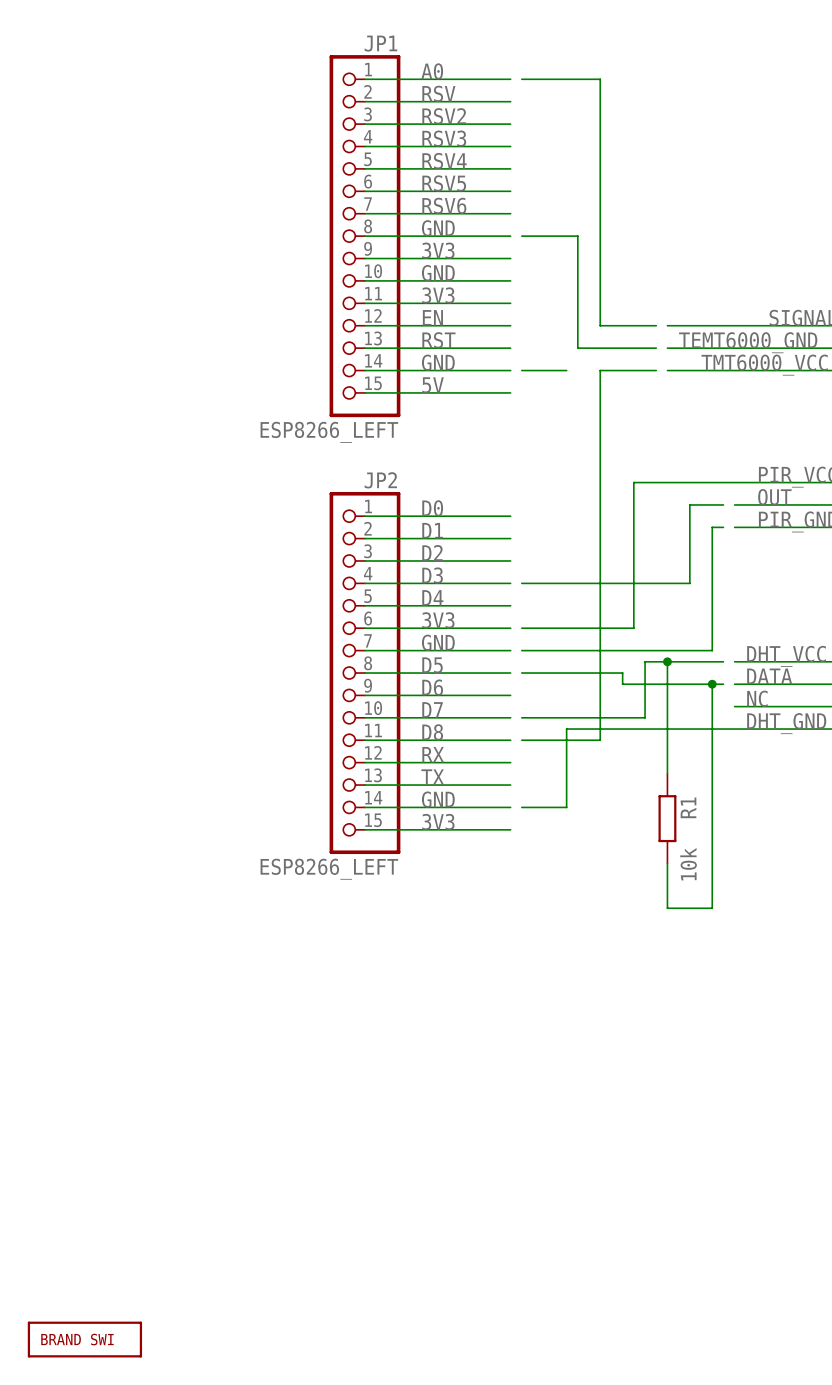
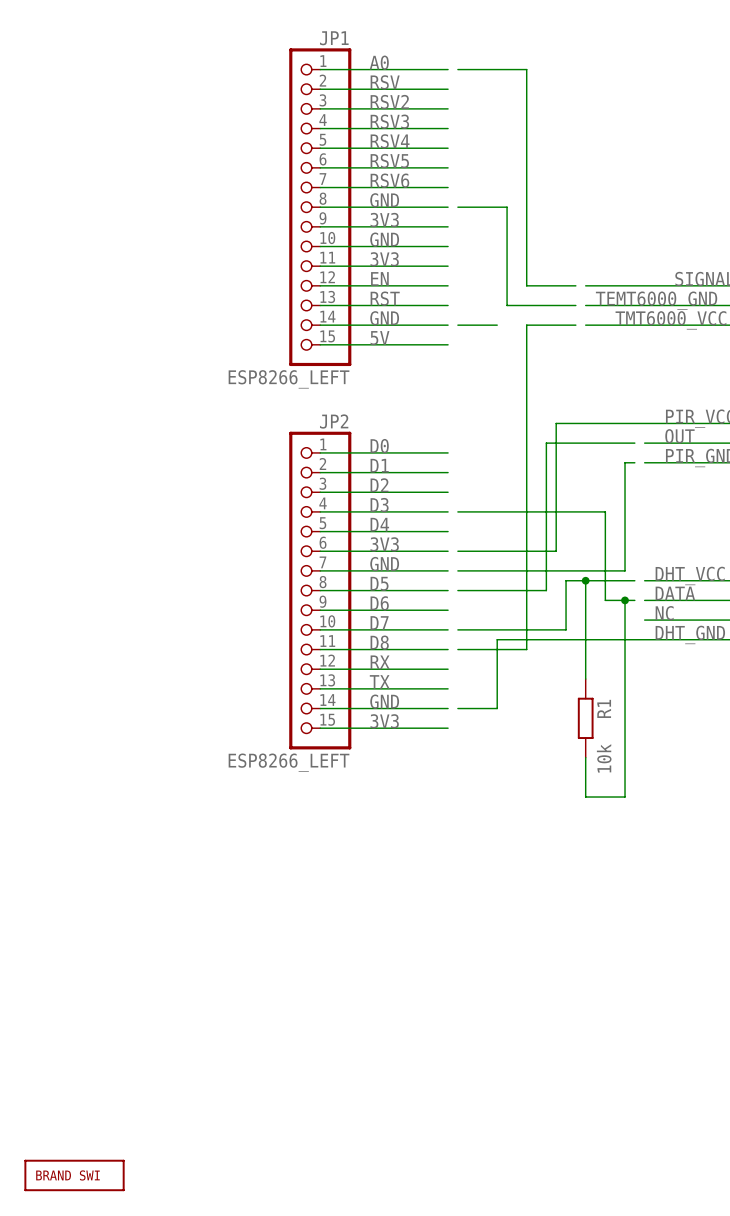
wire: (689, 504) (689, 583) -> (605, 443) (546, 443) (546, 590)
wire: (622, 673) (622, 684) (689, 684) -> (605, 511) (605, 600)

